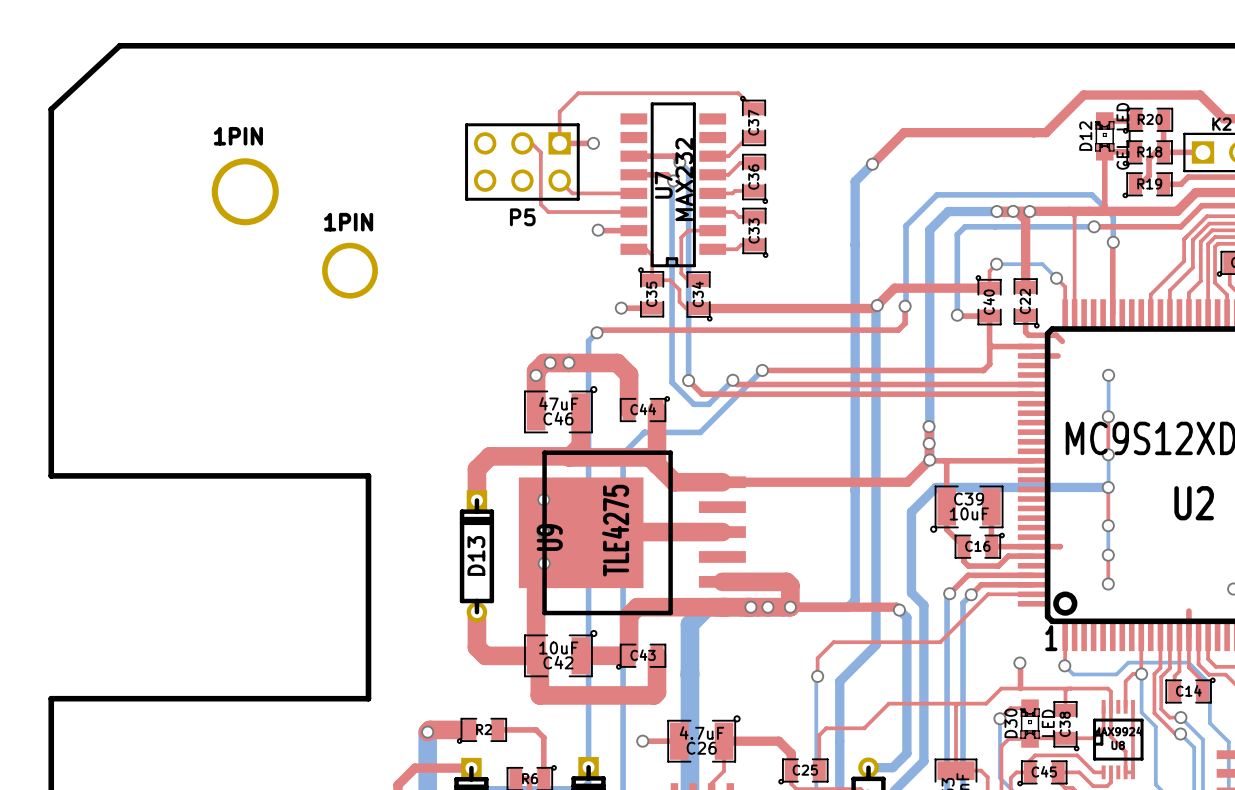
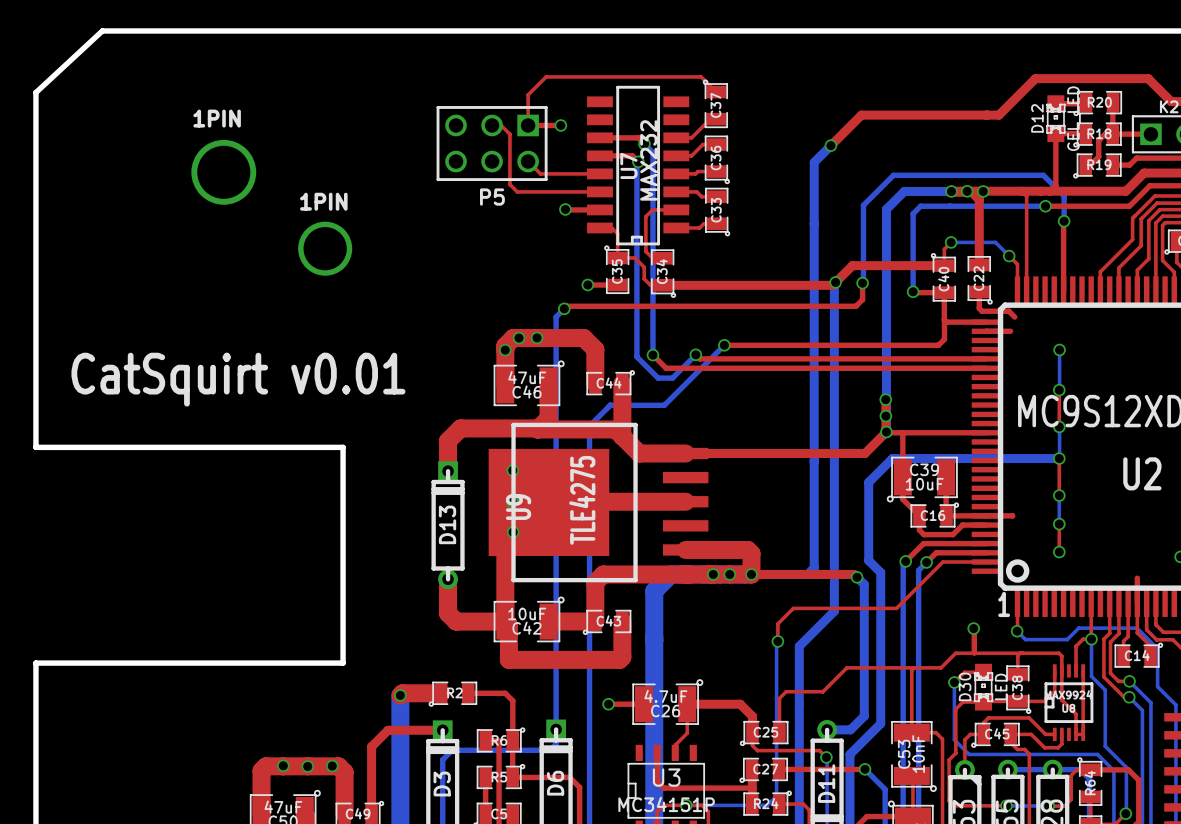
text: none -> CatSquirt v0.01 (238, 379)

